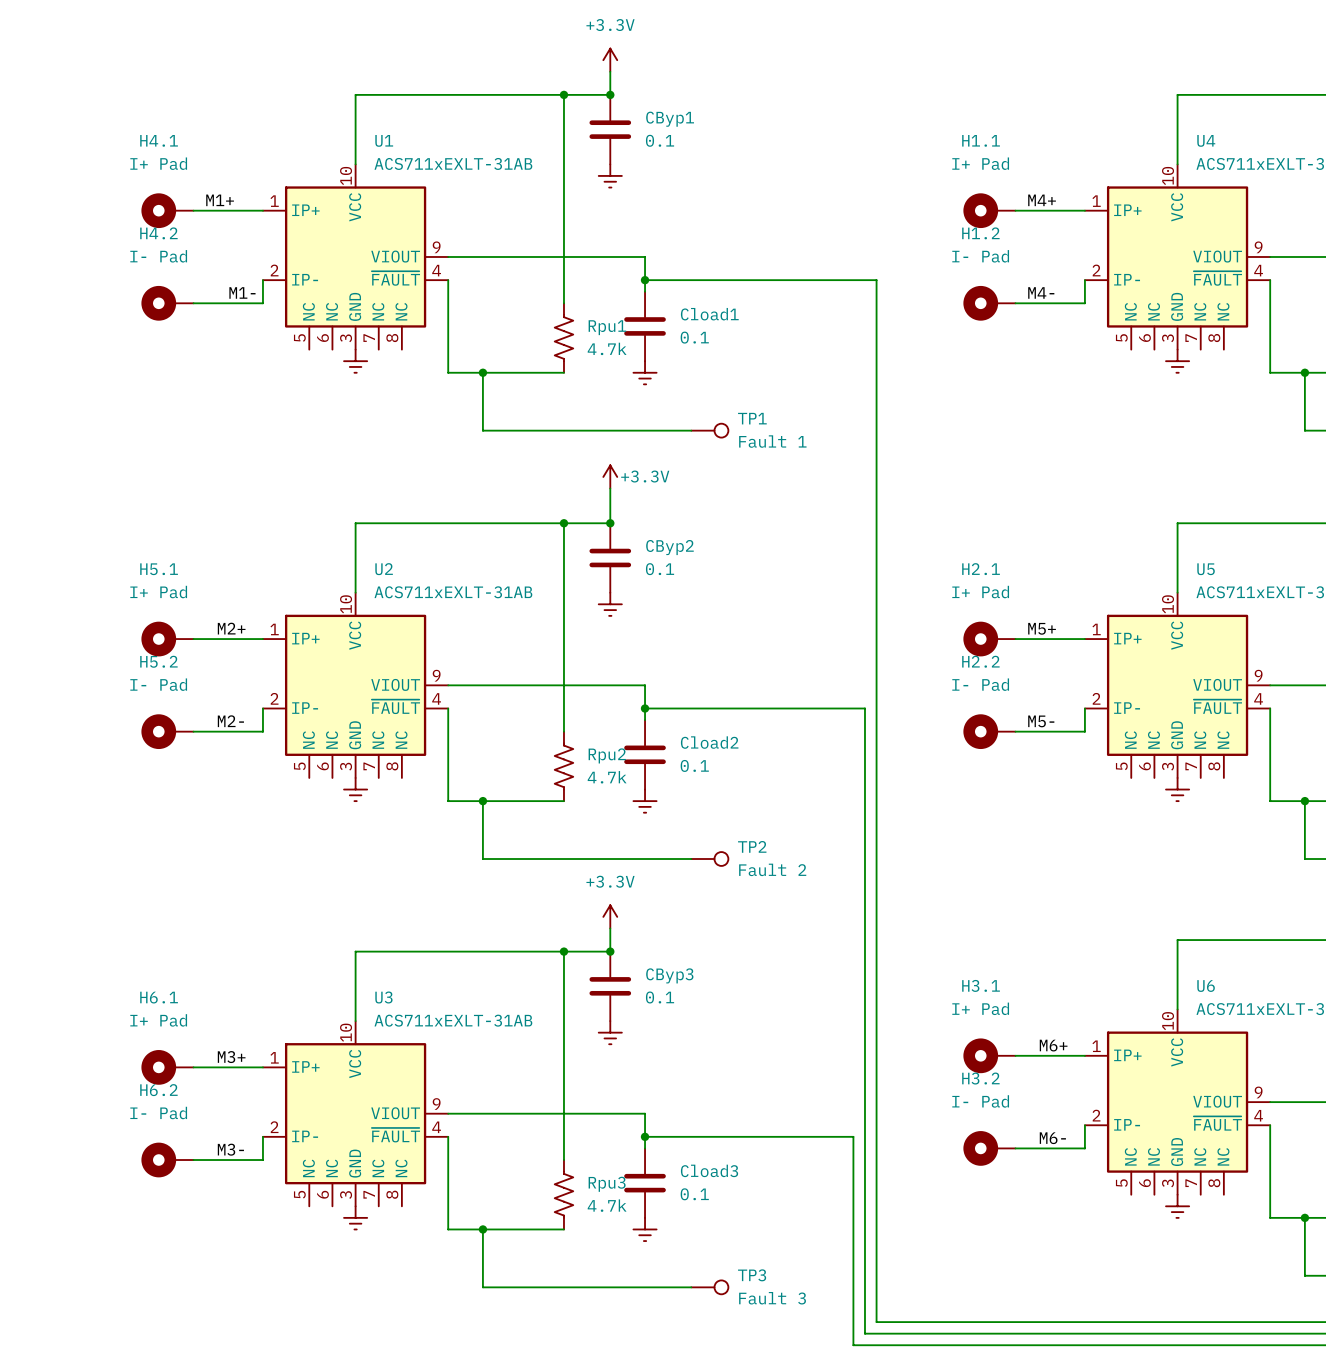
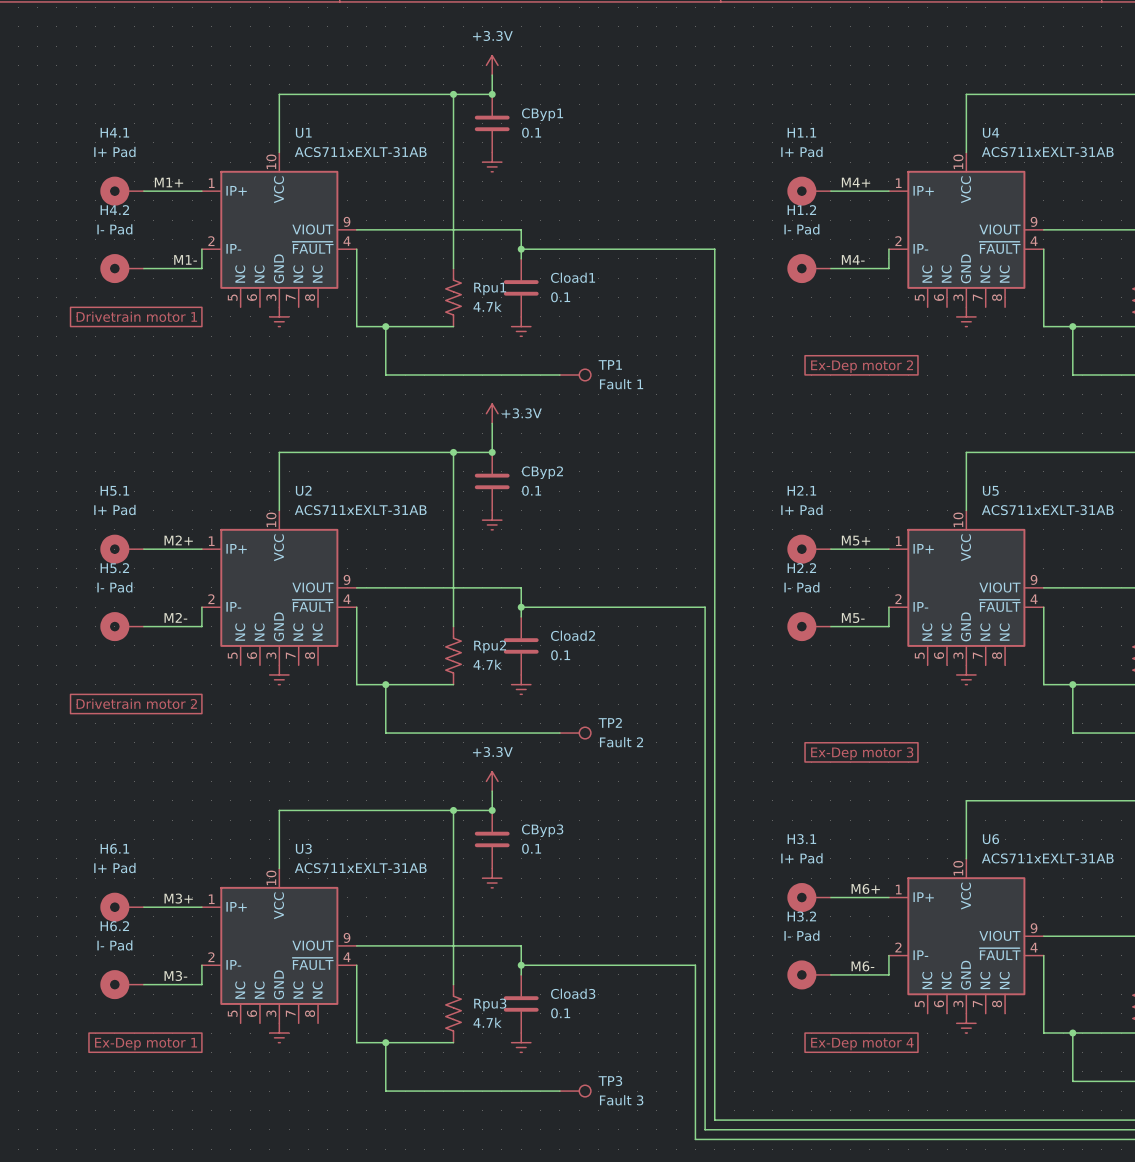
global label: none -> Drivetrain motor 1 (136, 316)
global label: none -> Ex-Dep motor 2 (862, 366)
global label: none -> Drivetrain motor 2 (136, 703)
global label: none -> Ex-Dep motor 3 (862, 753)
global label: none -> Ex-Dep motor 1 (146, 1044)
global label: none -> Ex-Dep motor 4 (862, 1044)

